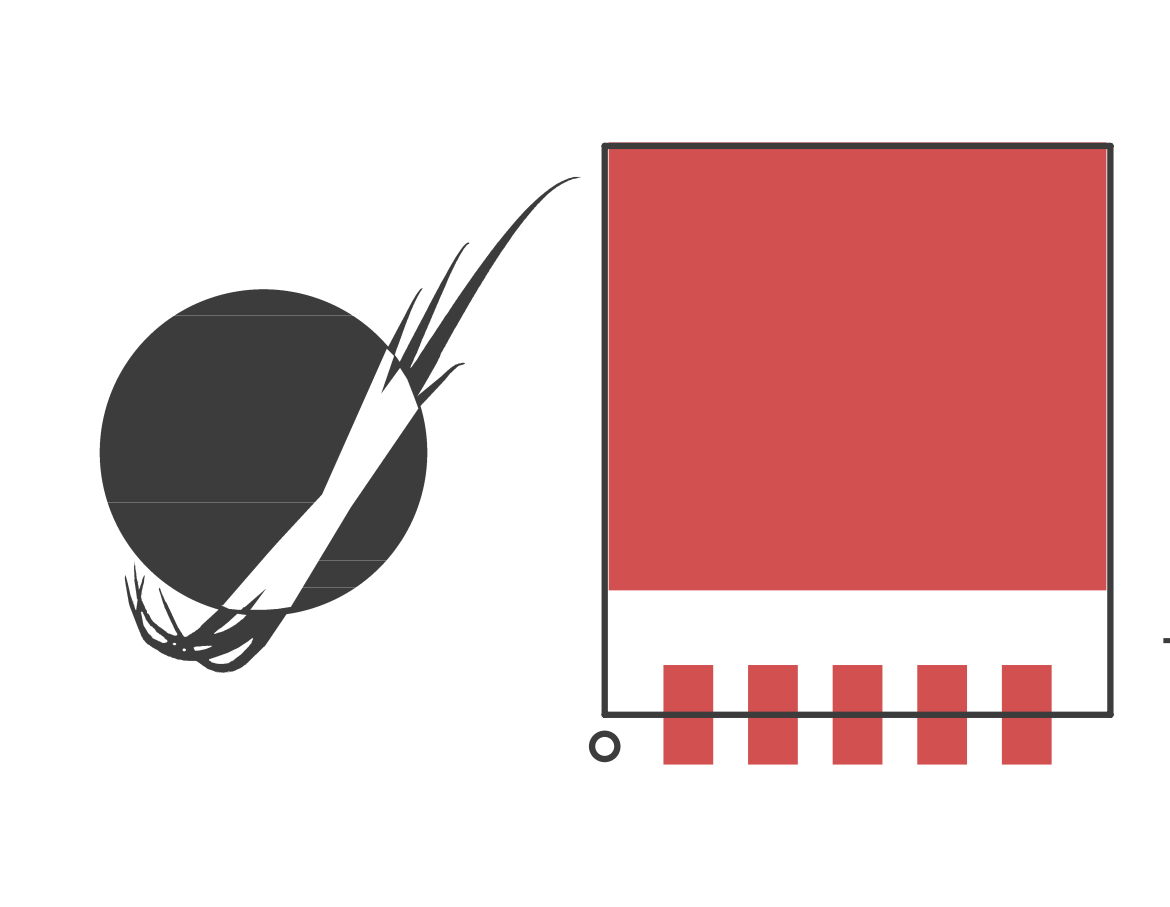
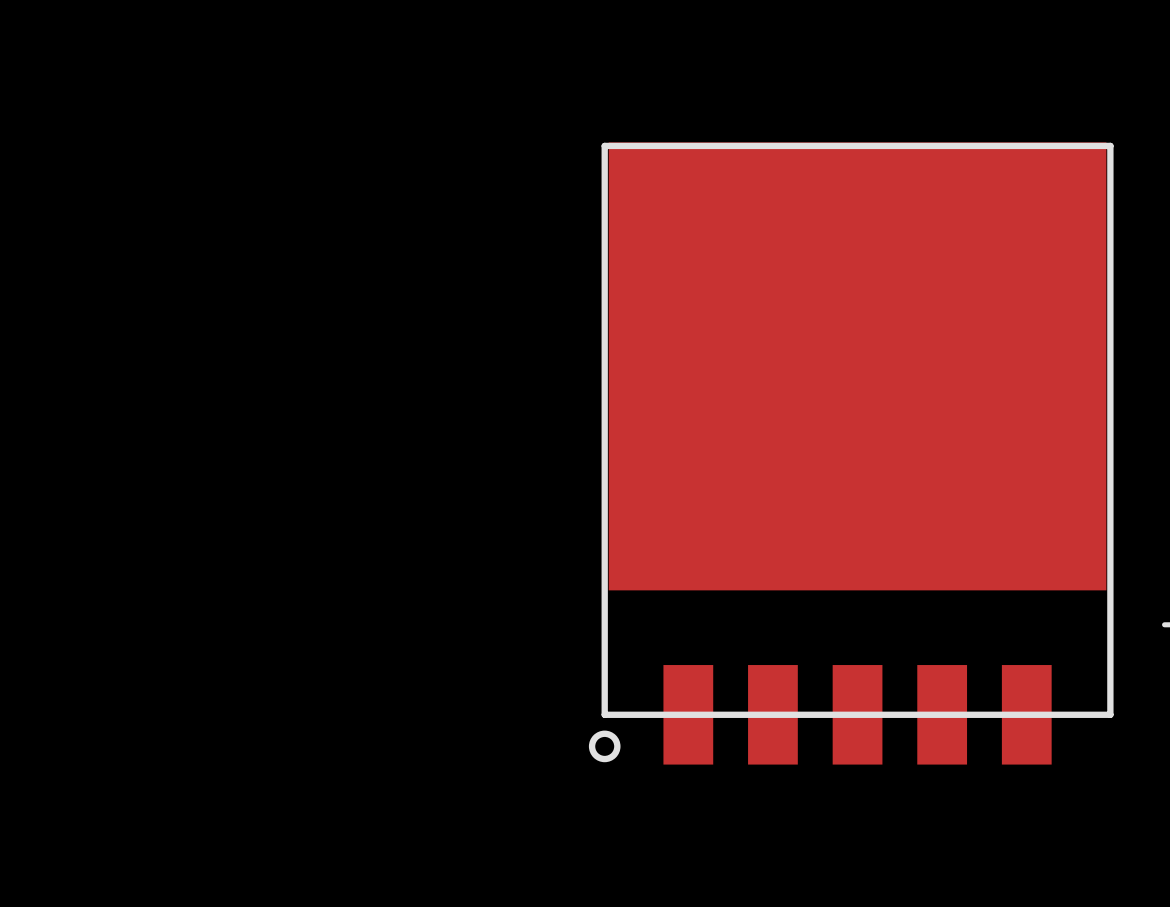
drawing: [99, 176, 581, 674] -> none

